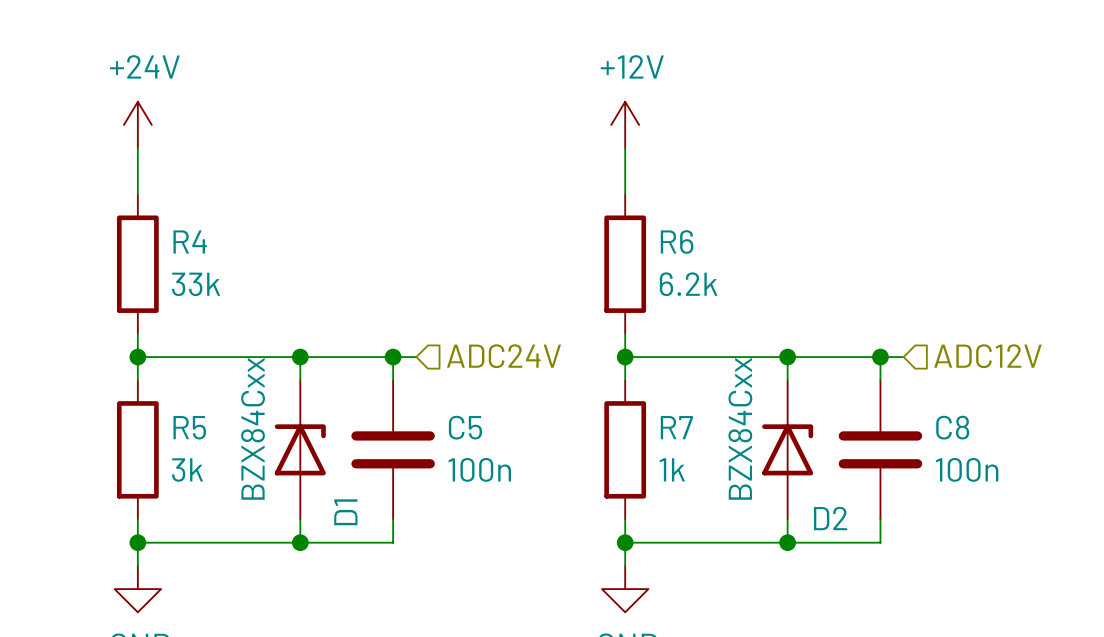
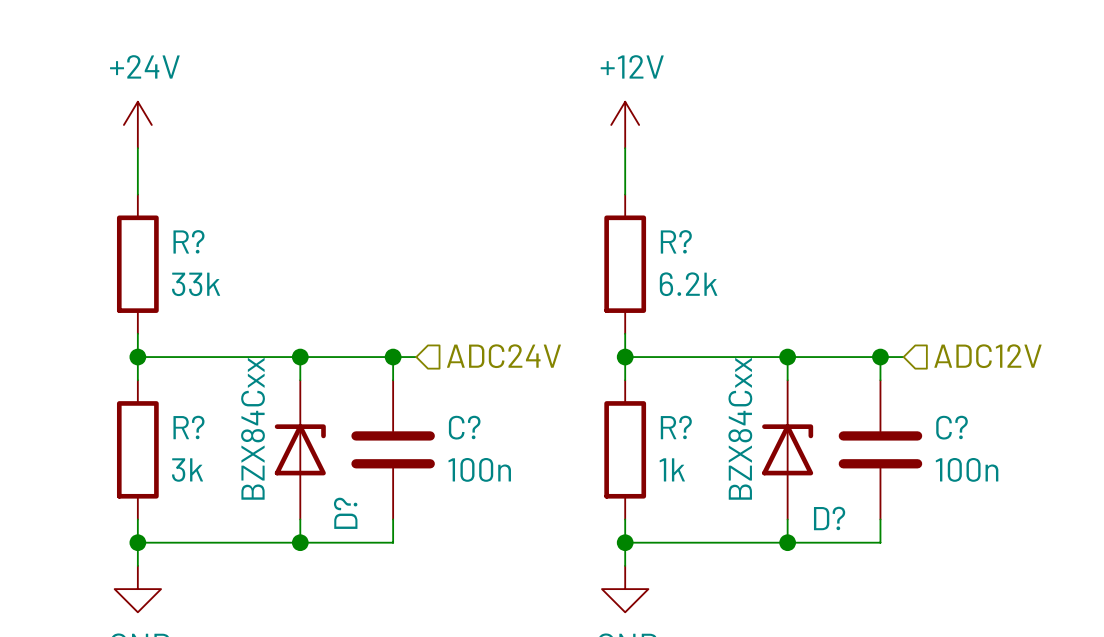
R4 name: R4 (190, 241) -> R? (188, 241)
R6 name: R6 (677, 241) -> R? (676, 241)
R5 name: R5 (189, 427) -> R? (188, 427)
C5 name: C5 (465, 427) -> C? (464, 427)
R7 name: R7 (676, 427) -> R? (676, 427)
C8 name: C8 (952, 427) -> C? (952, 427)
D1 name: D1 (345, 512) -> D? (345, 513)
D2 name: D2 (830, 518) -> D? (829, 518)

